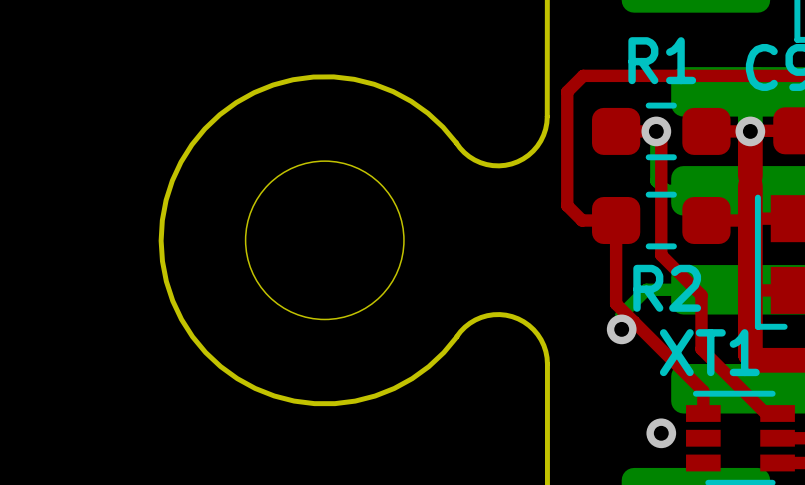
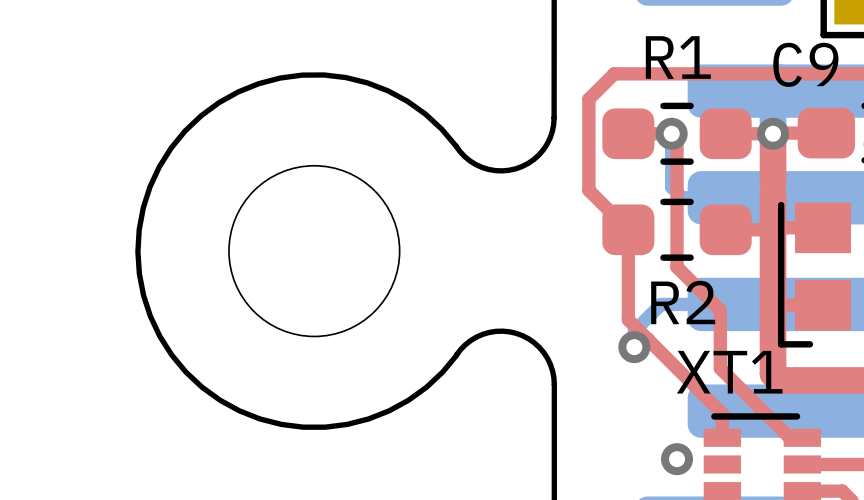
top track: (603, 75) (583, 75) (567, 91) (567, 205) (582, 220) (616, 220) -> (614, 73) (588, 99) (588, 190) (628, 229)

